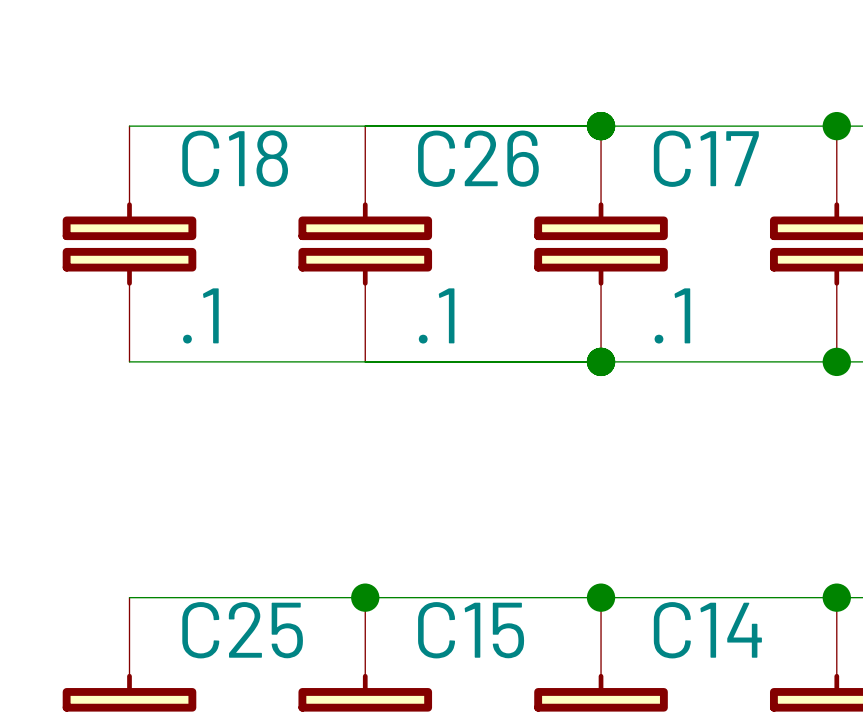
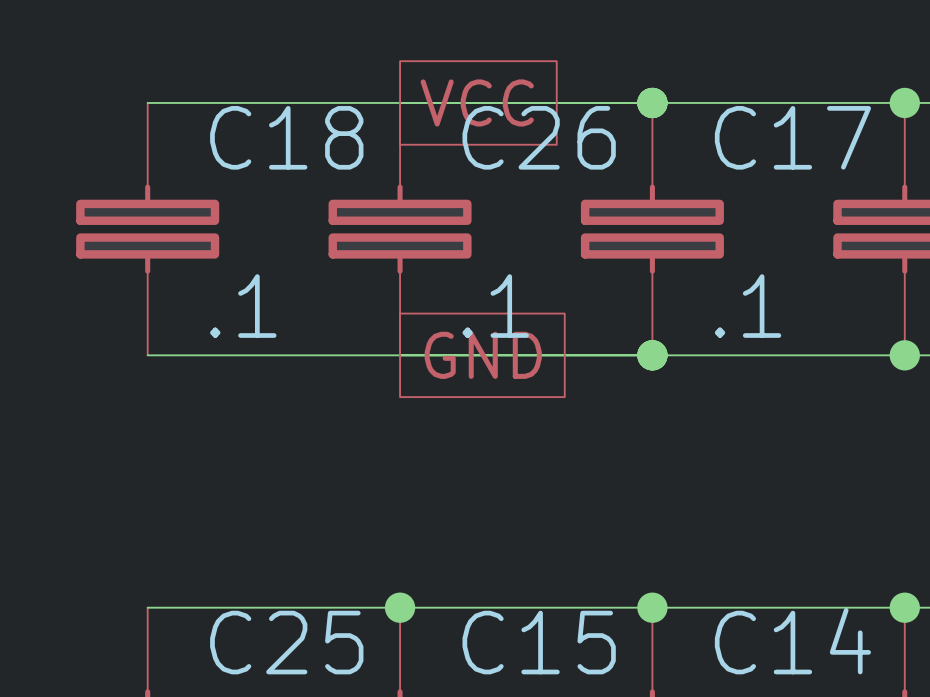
global label: none -> VCC (477, 102)
global label: none -> GND (483, 355)

